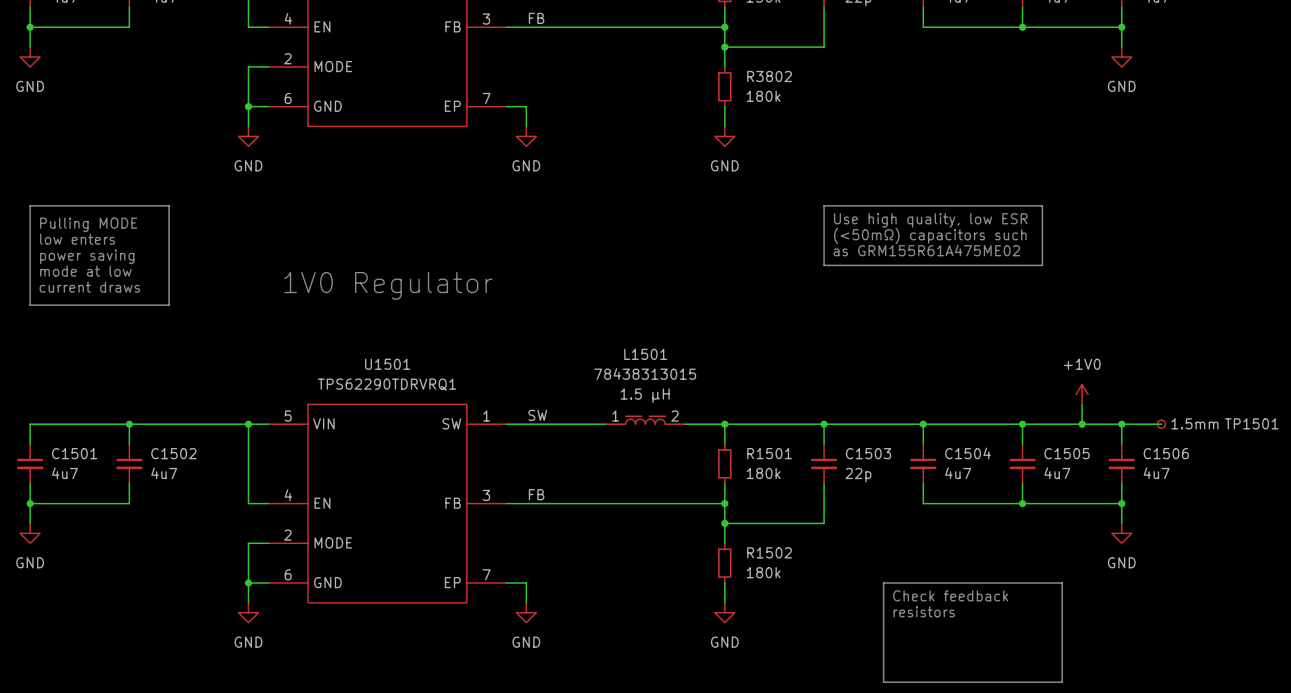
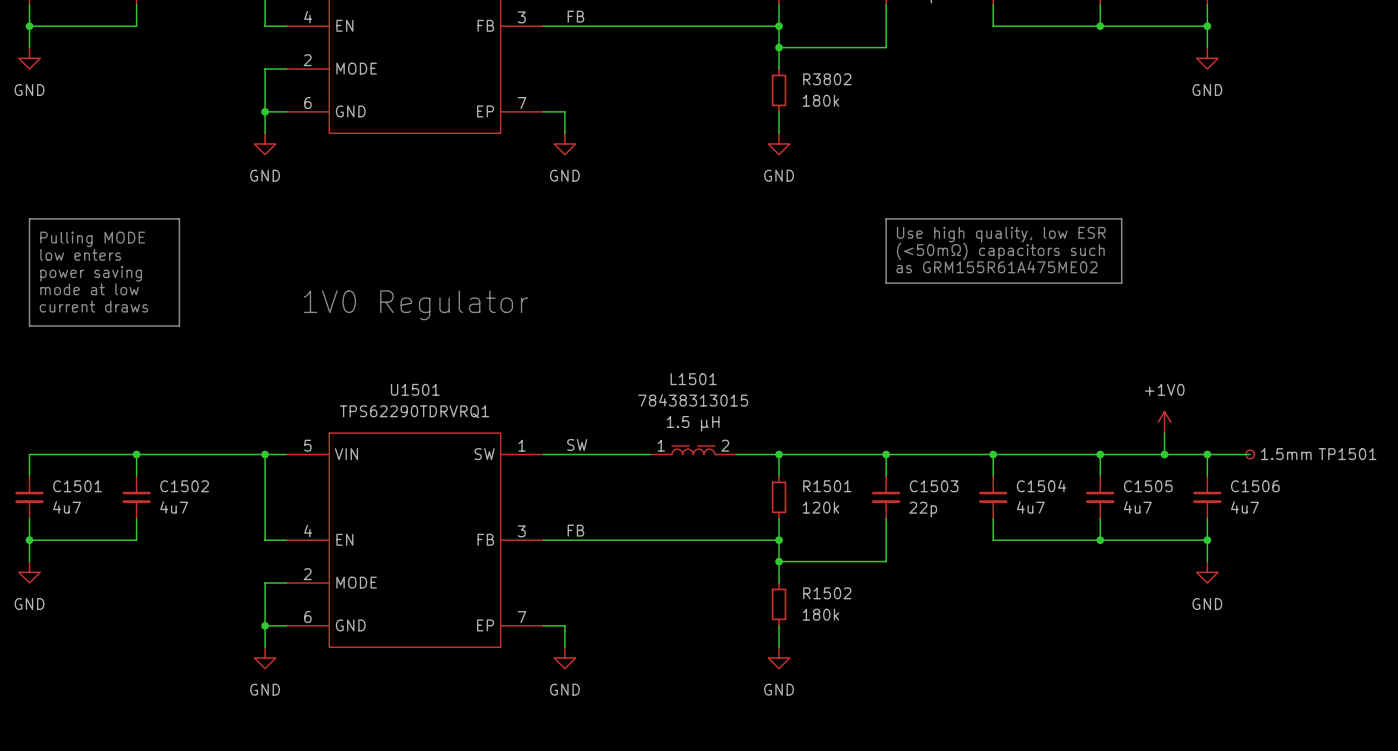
R1501 value: 180k (763, 473) -> 120k (820, 507)
line: (883, 582) (1062, 582) (1062, 682) (883, 682) (883, 582) -> none
text: Check feedback (950, 595) -> none
text: resistors (924, 611) -> none

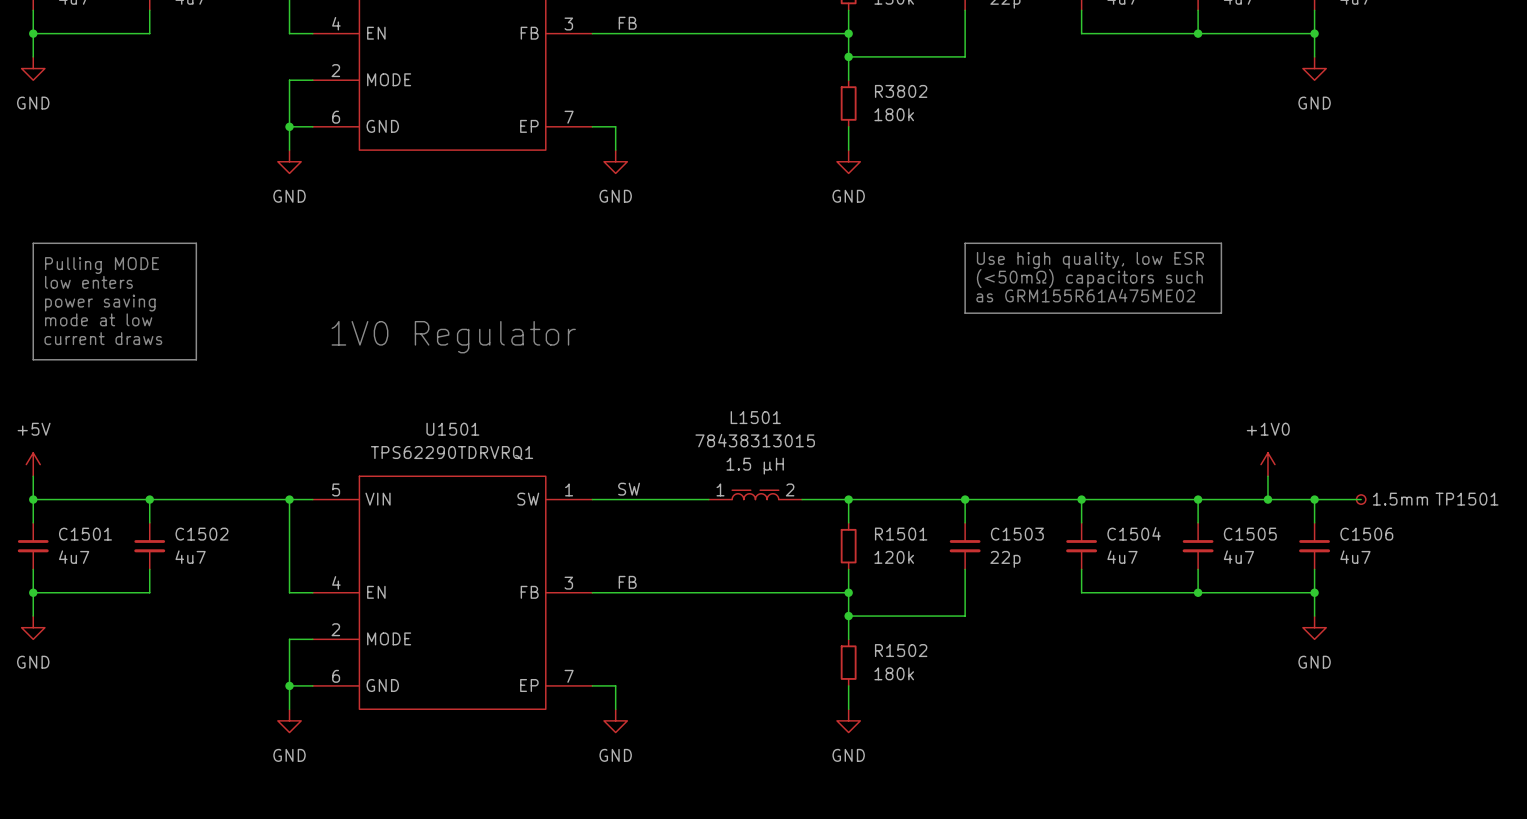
power symbol: none -> +5V (33, 464)
wire: none -> (33, 476) (33, 499)
junction: none -> (33, 499)

